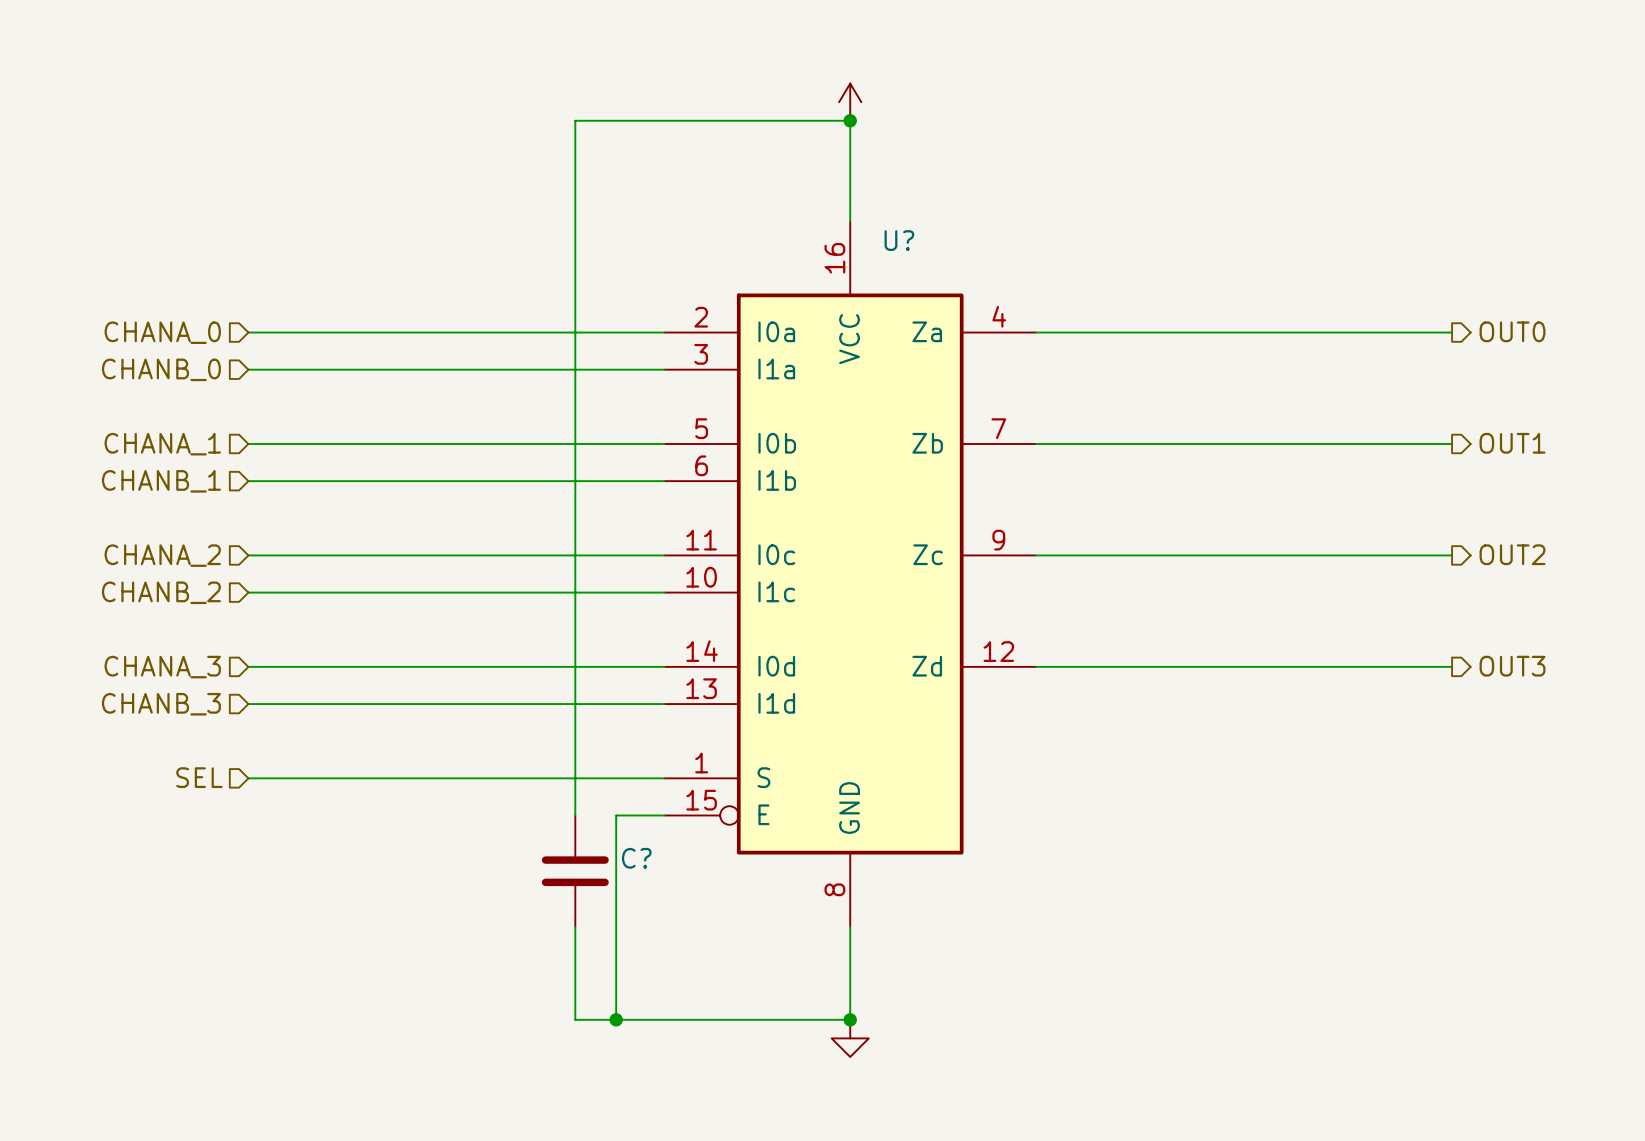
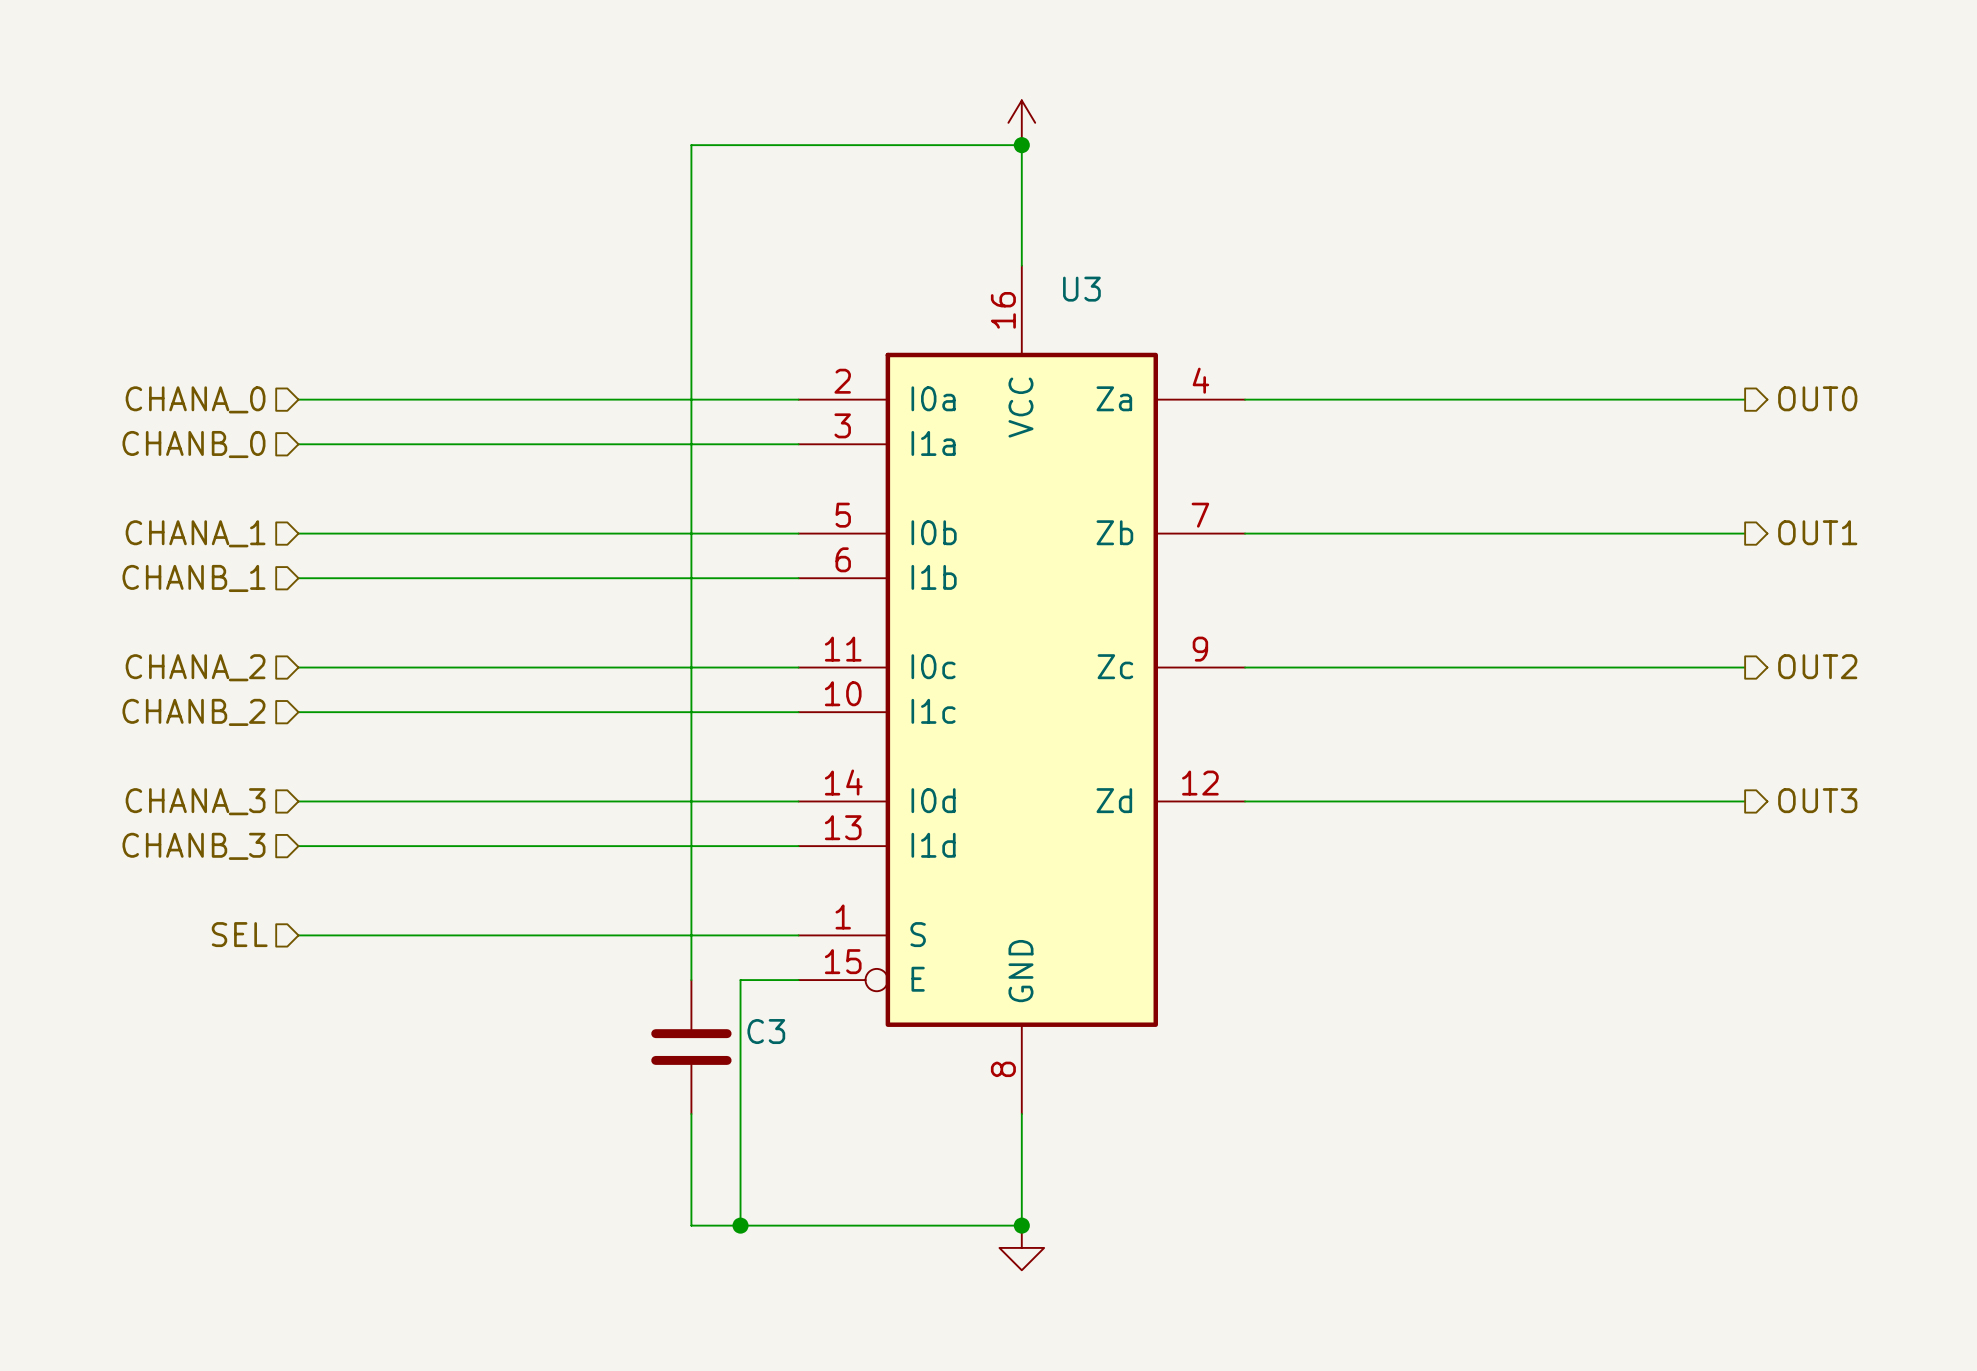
U? name: U? (899, 240) -> U3 (1081, 289)
C? name: C? (636, 858) -> C3 (766, 1031)

